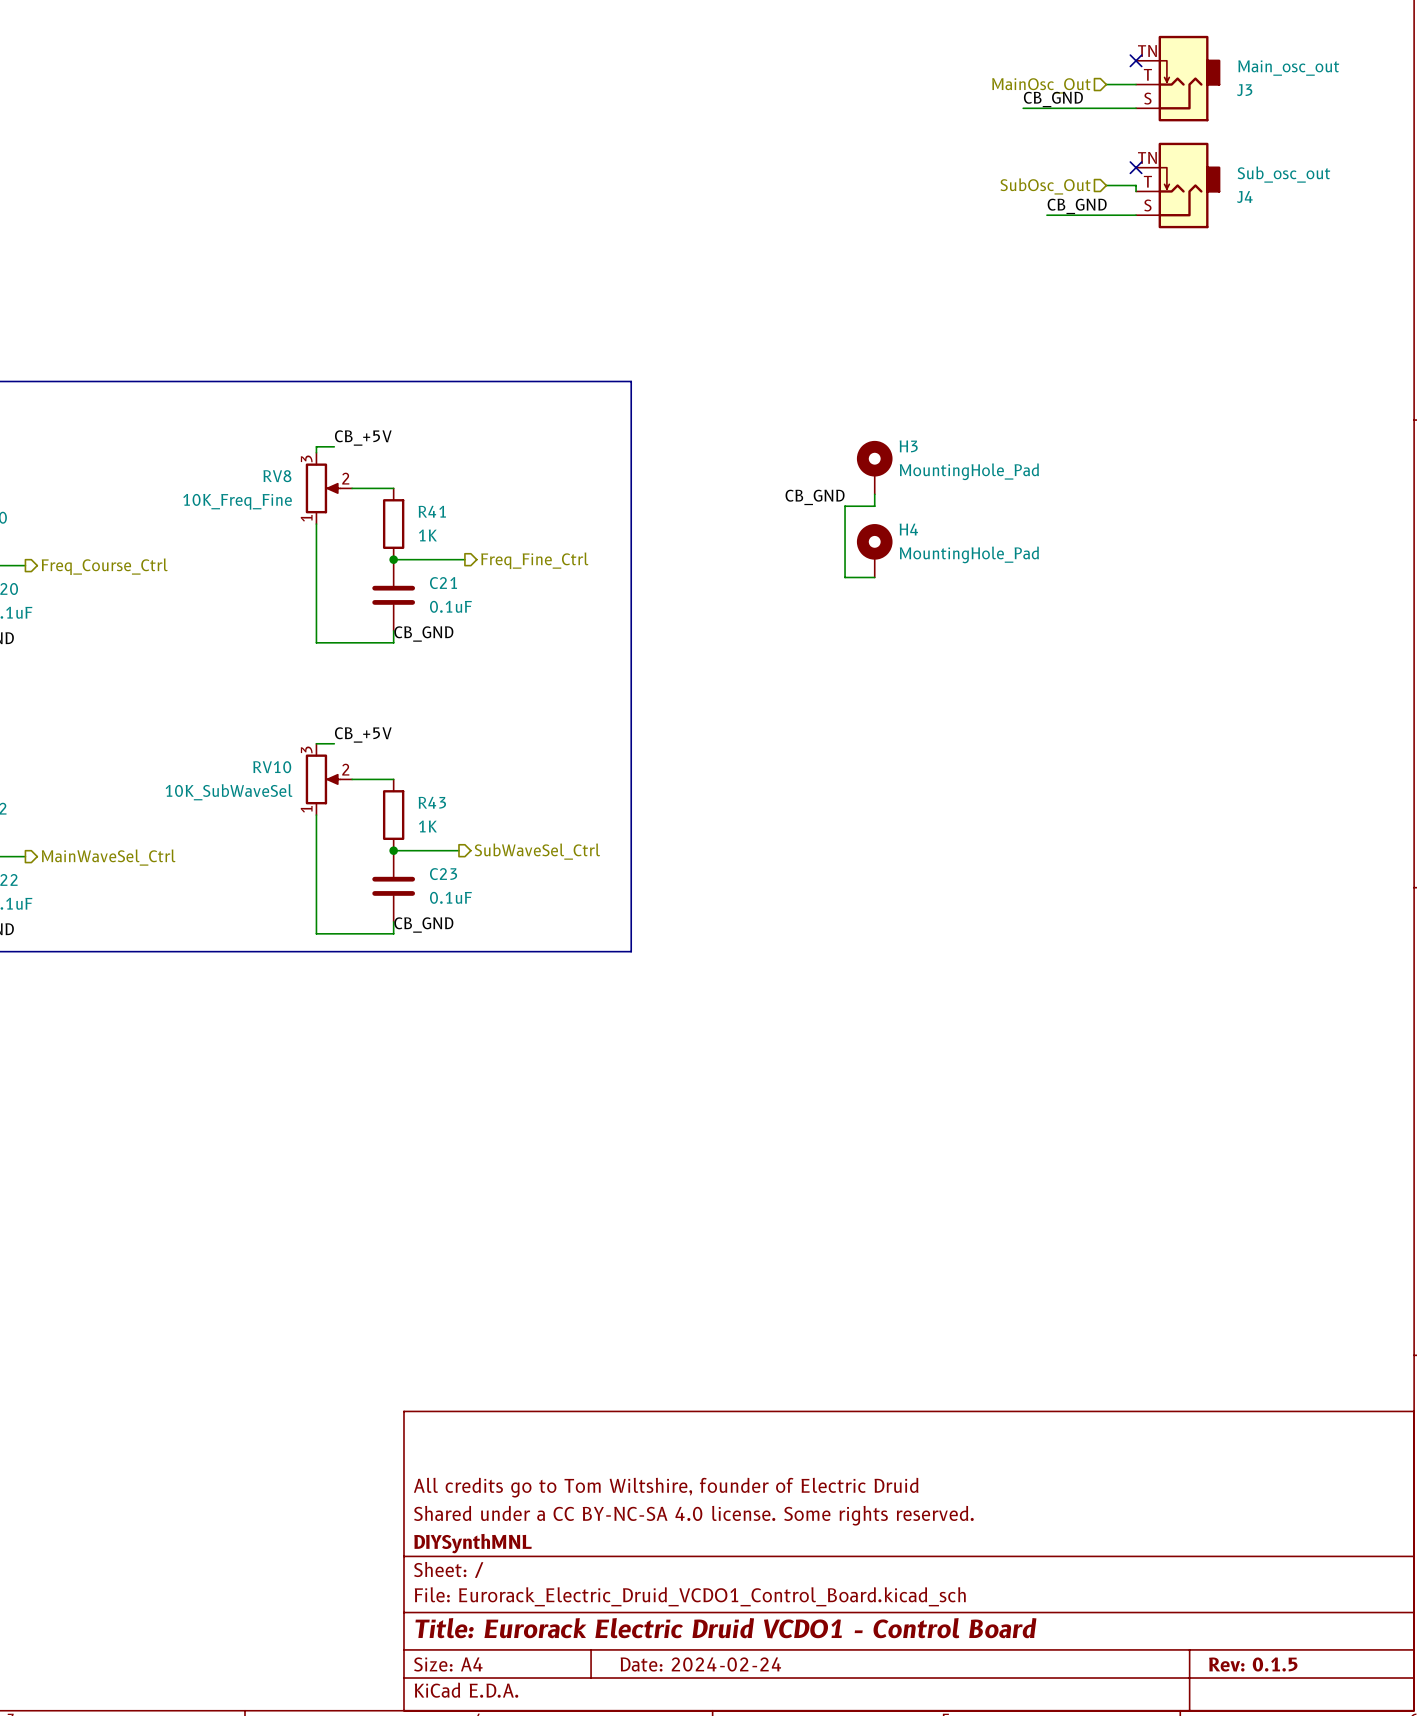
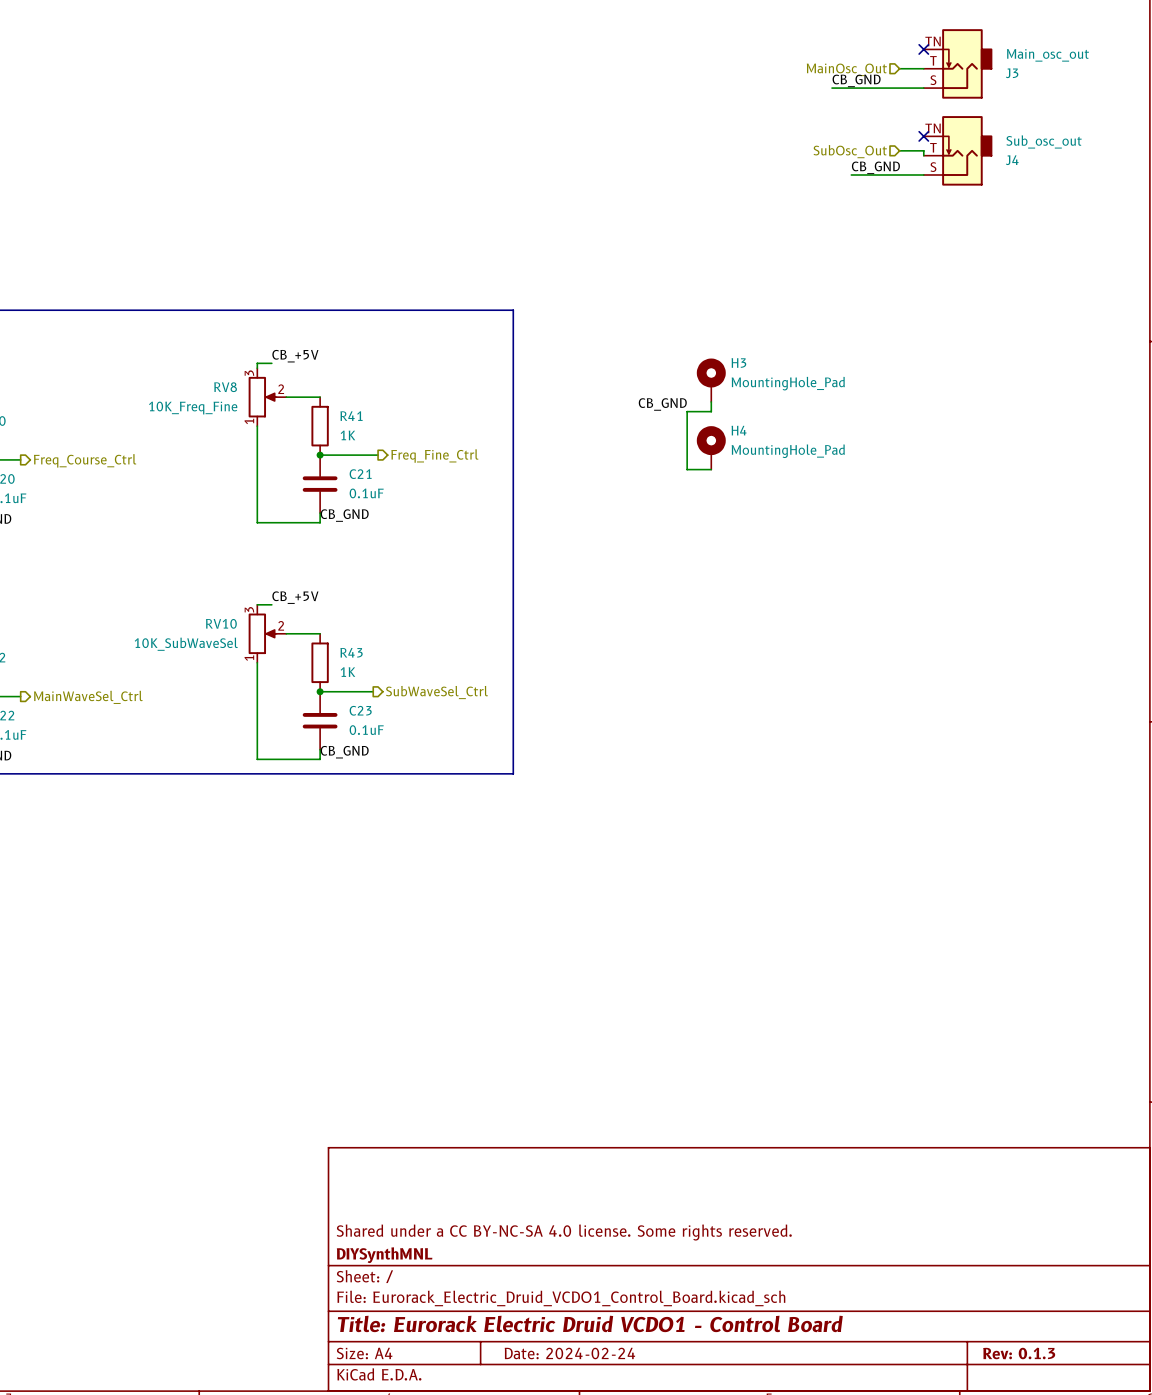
title block: All credits go to Tom Wiltshire, founder of Electric Druid (666, 1487) -> none
title block: Rev: 0.1.5 (1253, 1664) -> Rev: 0.1.3 (1019, 1353)

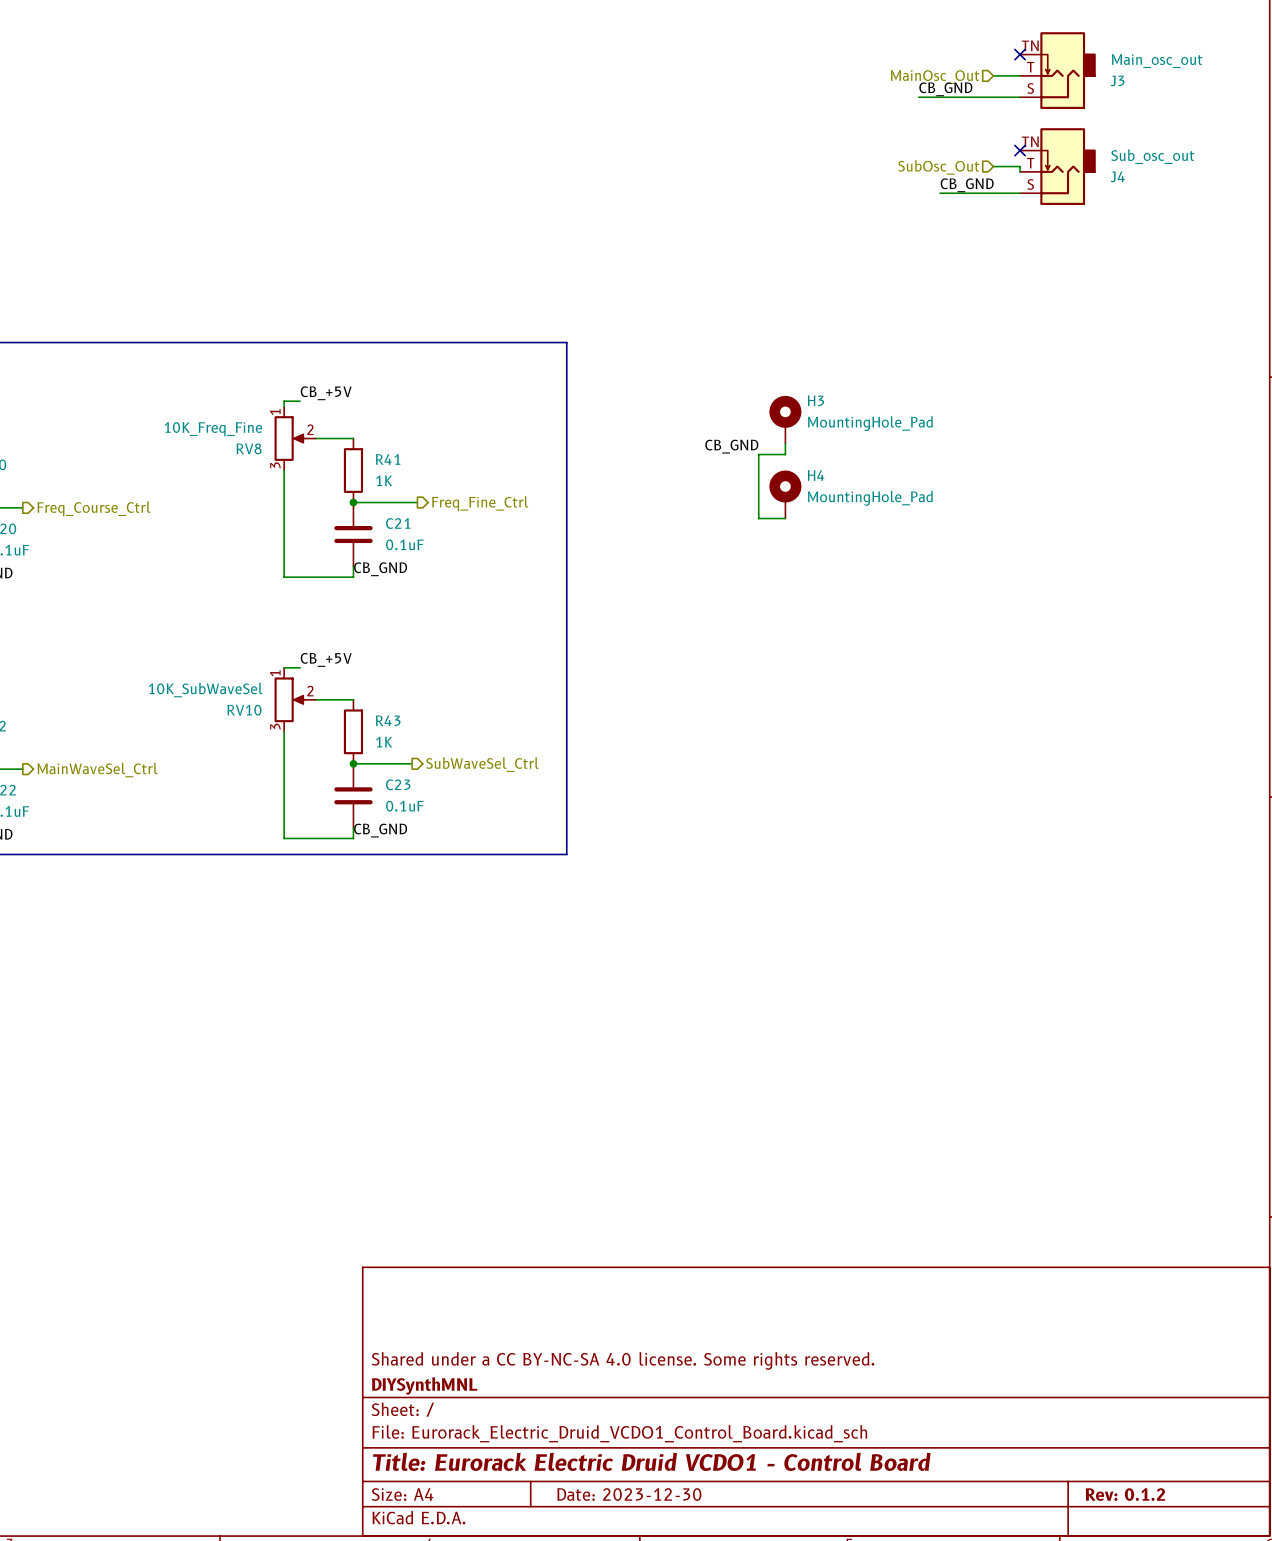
RV8 flip: as is (262, 397) -> up-down (290, 438)
RV10 flip: as is (262, 633) -> up-down (290, 699)
title block: Date: 2024-02-24 (569, 1353) -> Date: 2023-12-30 (629, 1494)
title block: Rev: 0.1.3 (1019, 1353) -> Rev: 0.1.2 (1125, 1494)

